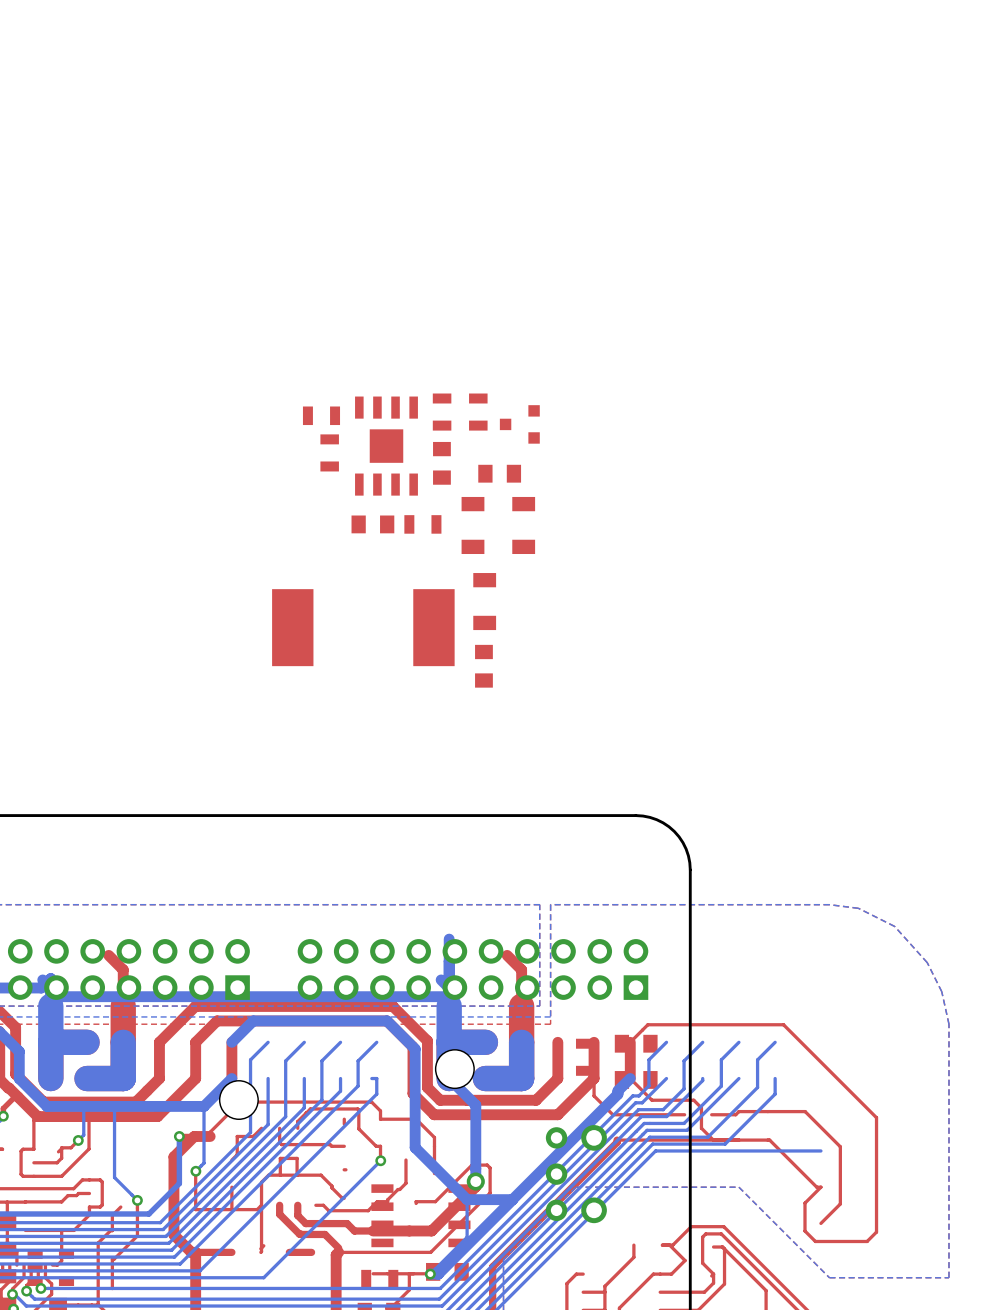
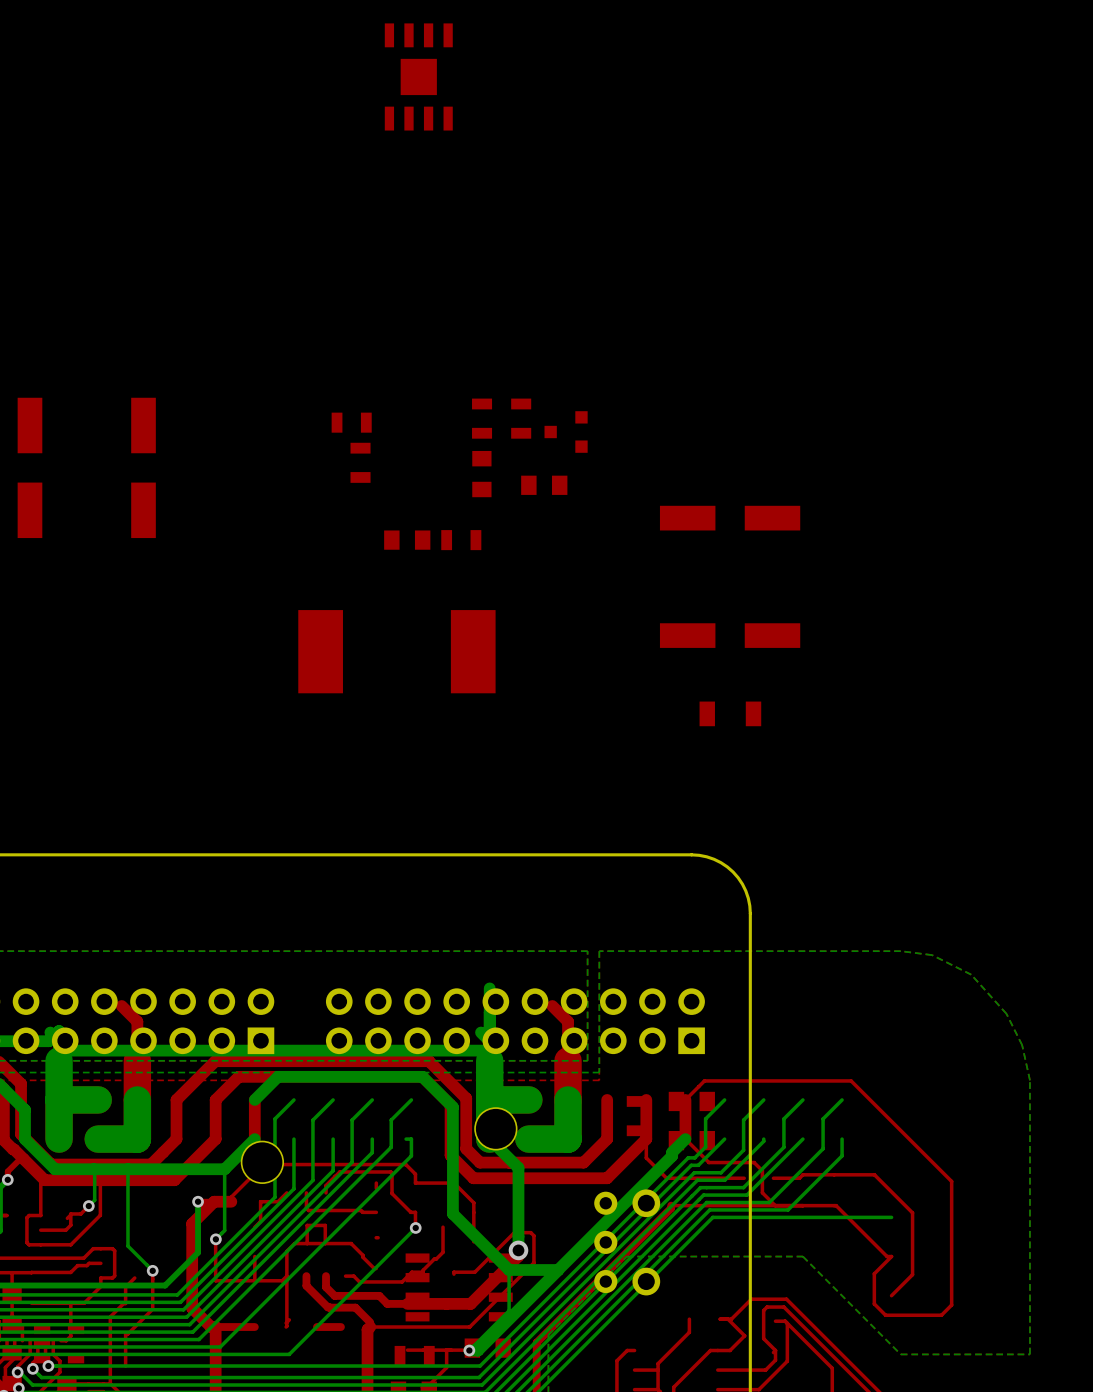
part position: (386, 446) -> (418, 76)
part: none -> (29, 467)
part: none -> (143, 467)
part: none -> (730, 518)
part: (472, 525) -> none
part: (523, 525) -> none
part: (484, 601) -> none
part: none -> (730, 635)
part: (483, 666) -> none
part: none -> (730, 713)

